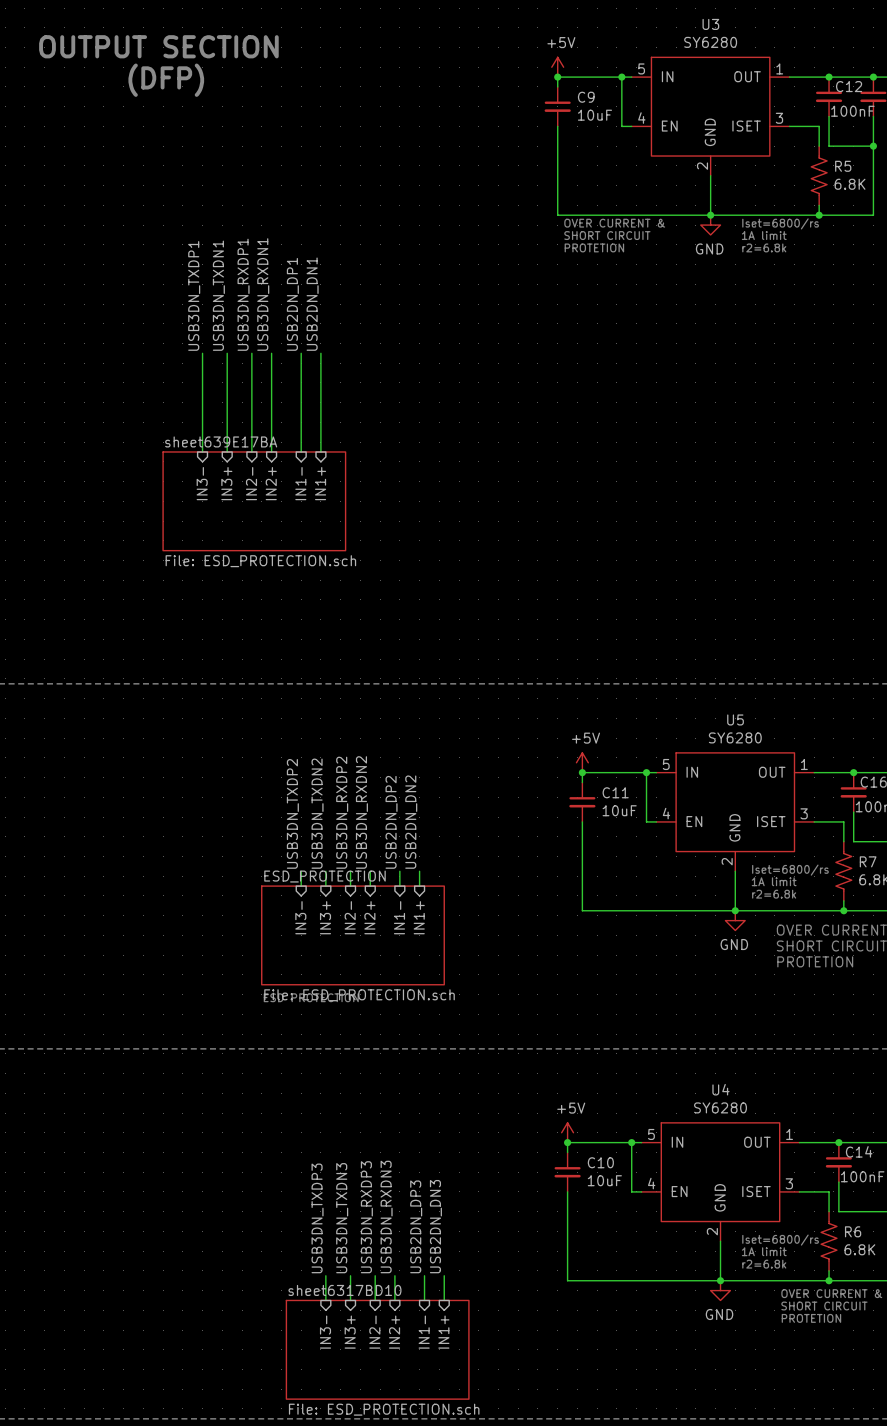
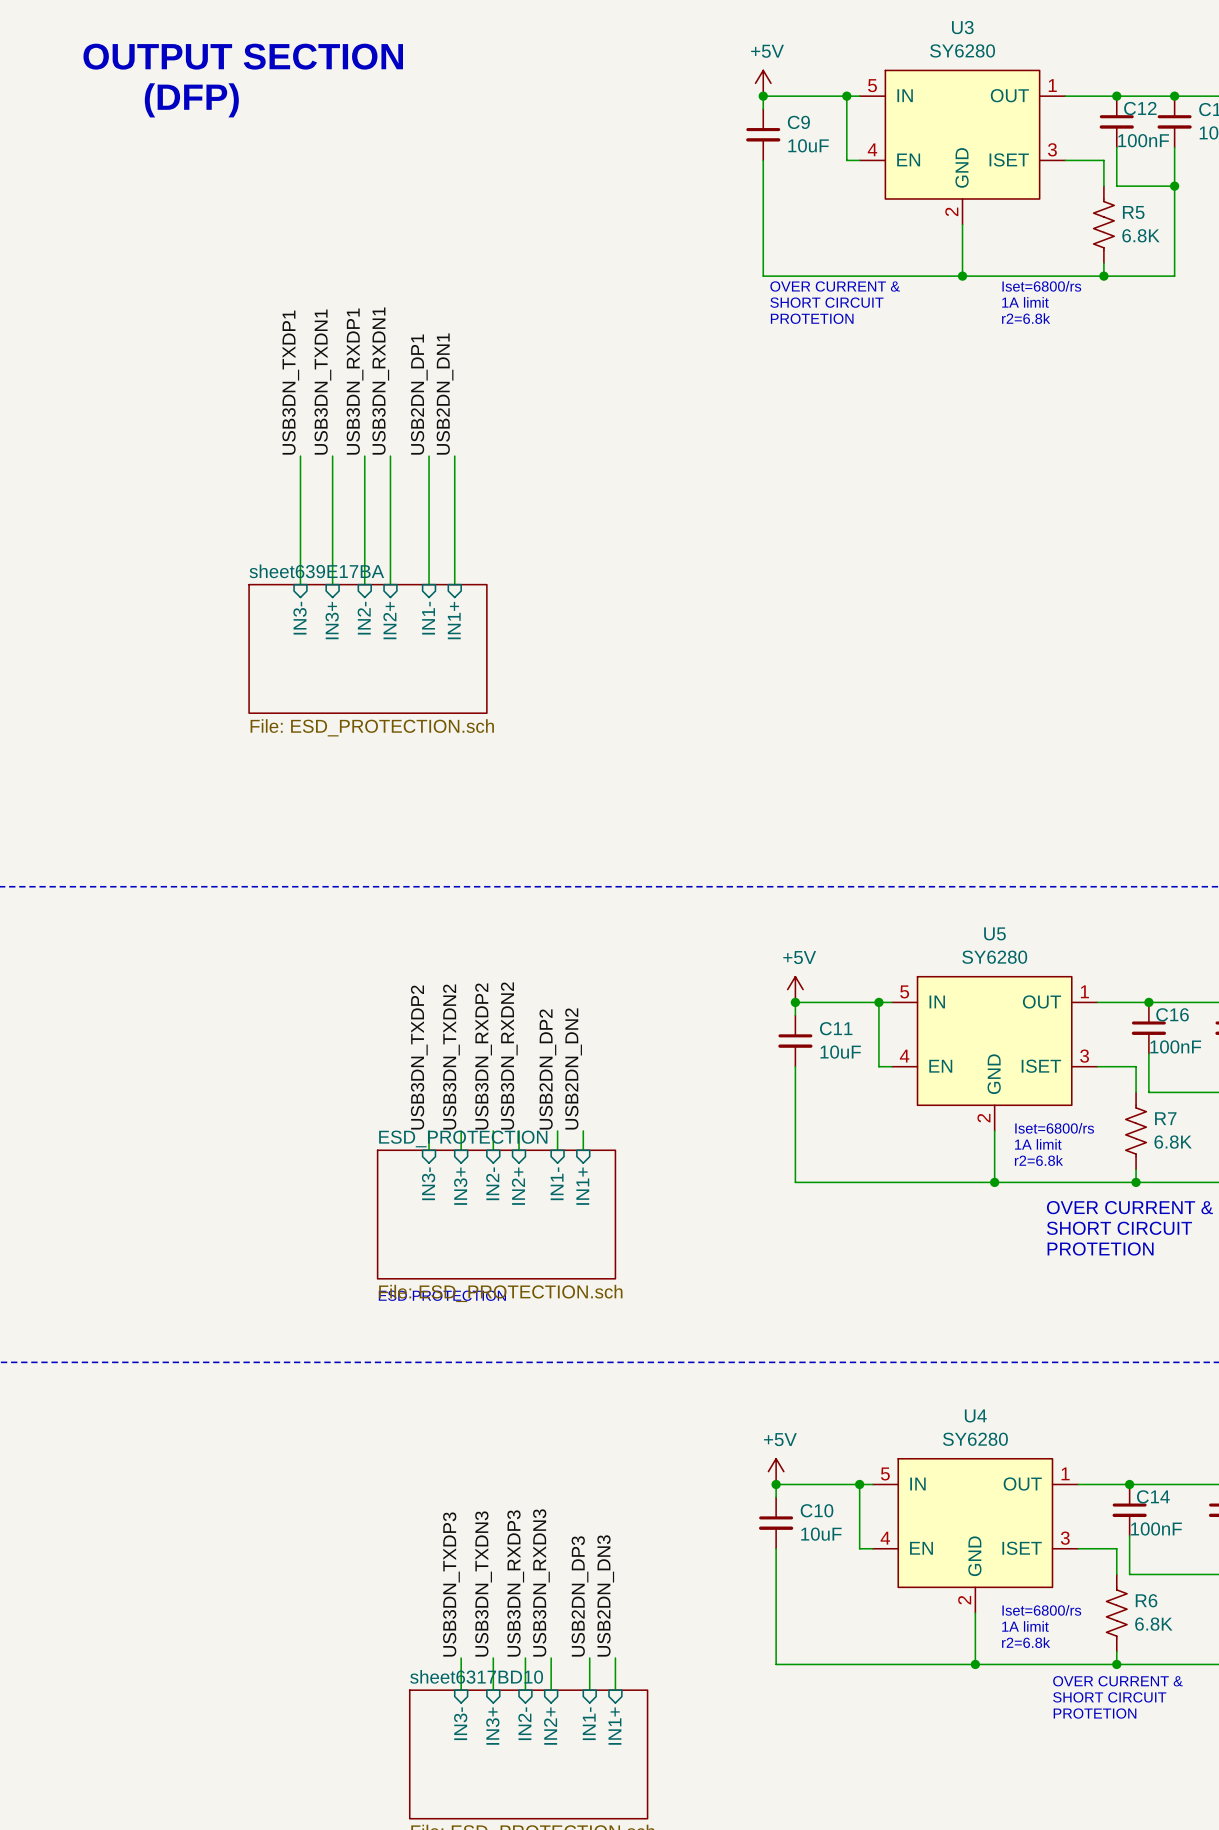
power symbol: GND (710, 225) -> none
power symbol: GND (735, 920) -> none
power symbol: GND (720, 1290) -> none

